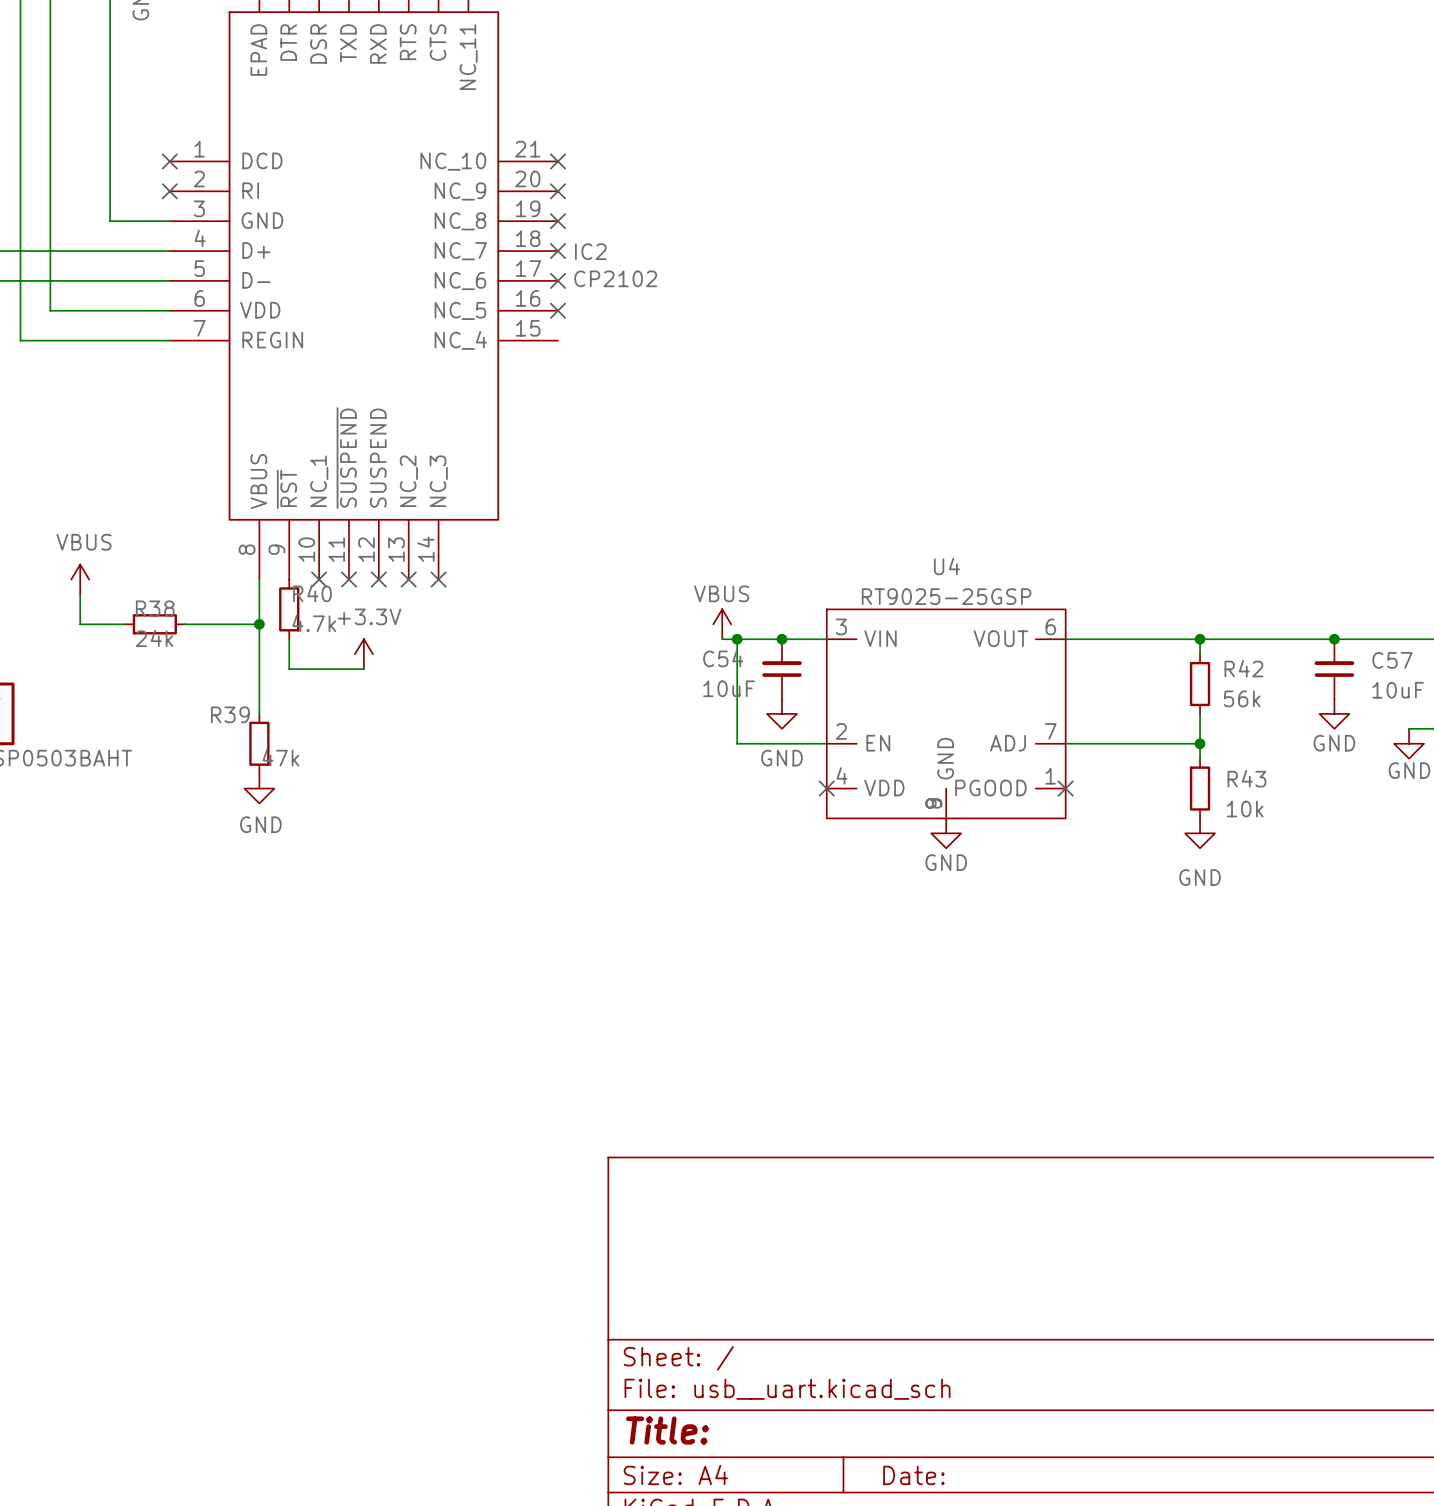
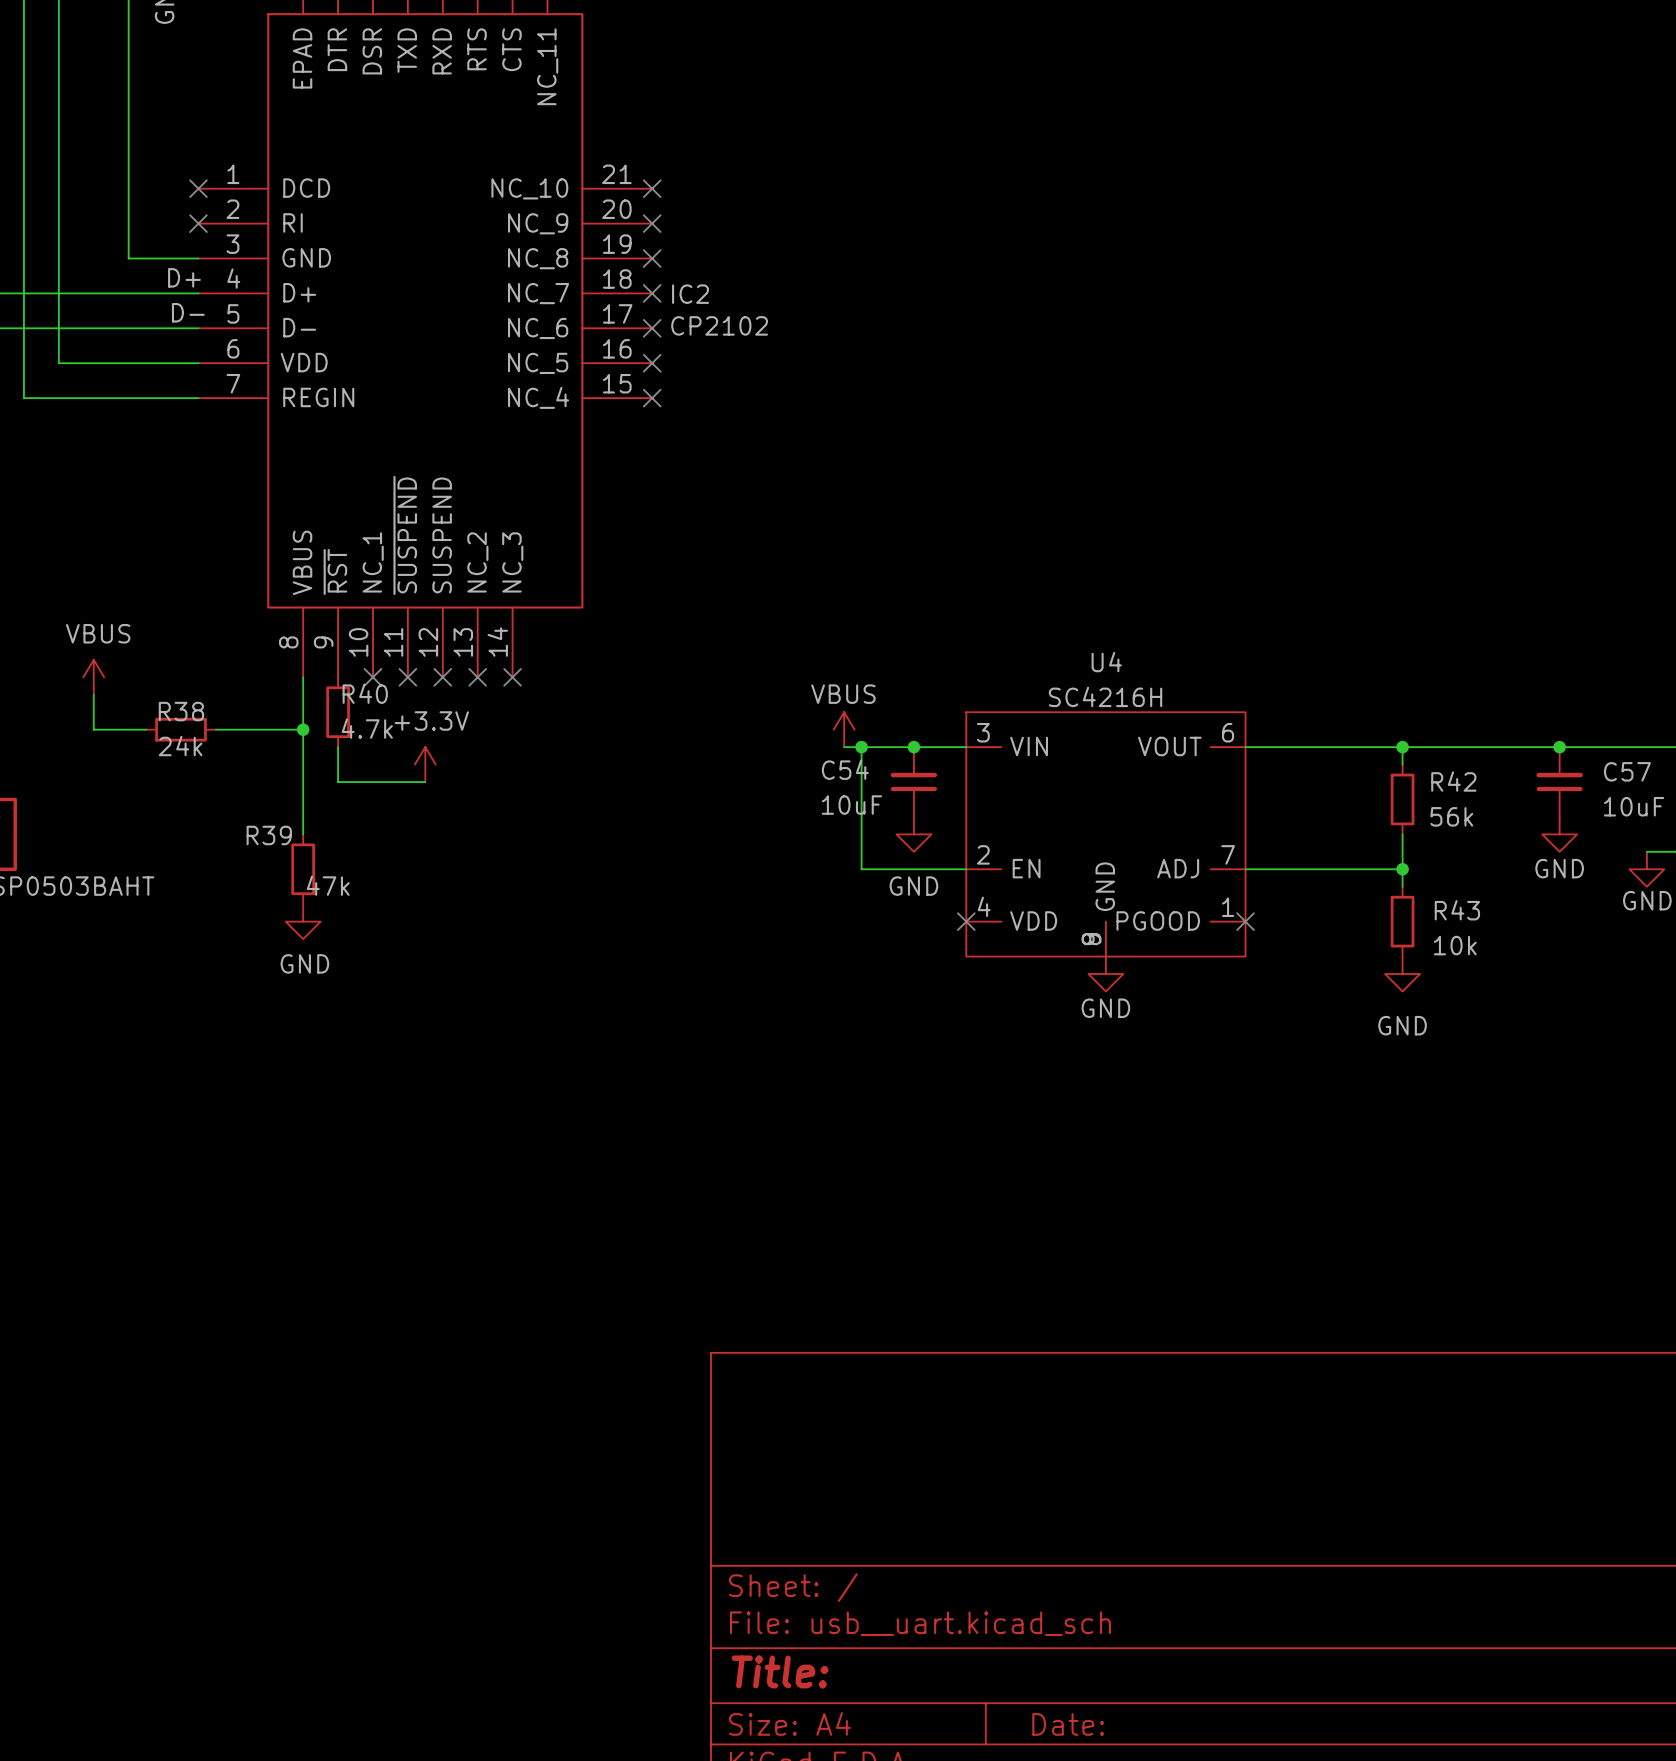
label: none -> D+ (184, 277)
label: none -> D- (188, 312)
no-connect mark: none -> (652, 398)
U4 value: RT9025-25GSP (946, 596) -> SC4216H (1105, 696)

